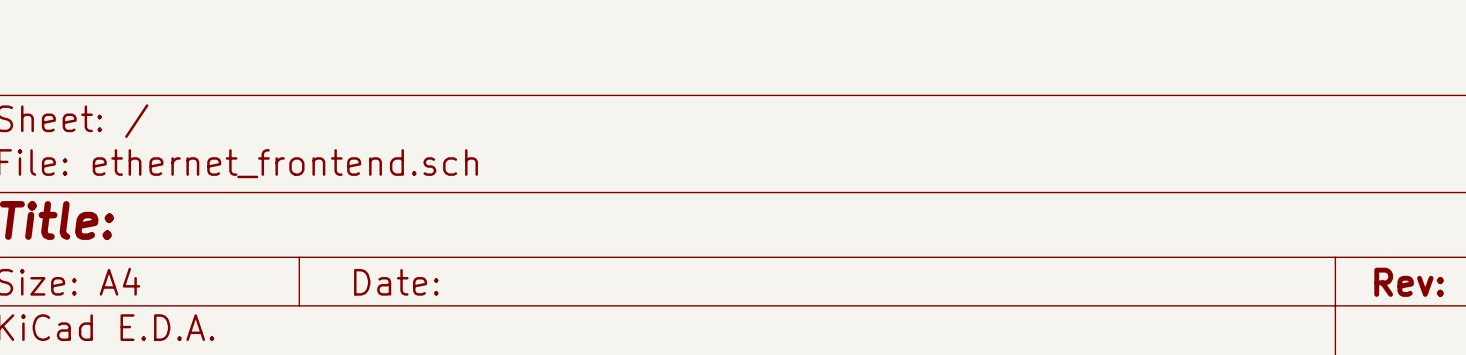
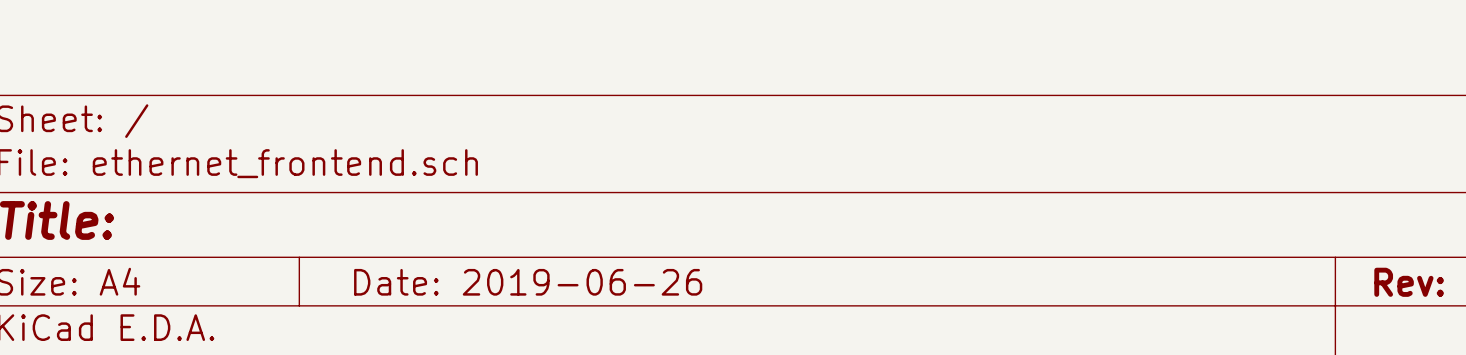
title block: Date: (396, 282) -> Date: 2019-06-26 (528, 282)

